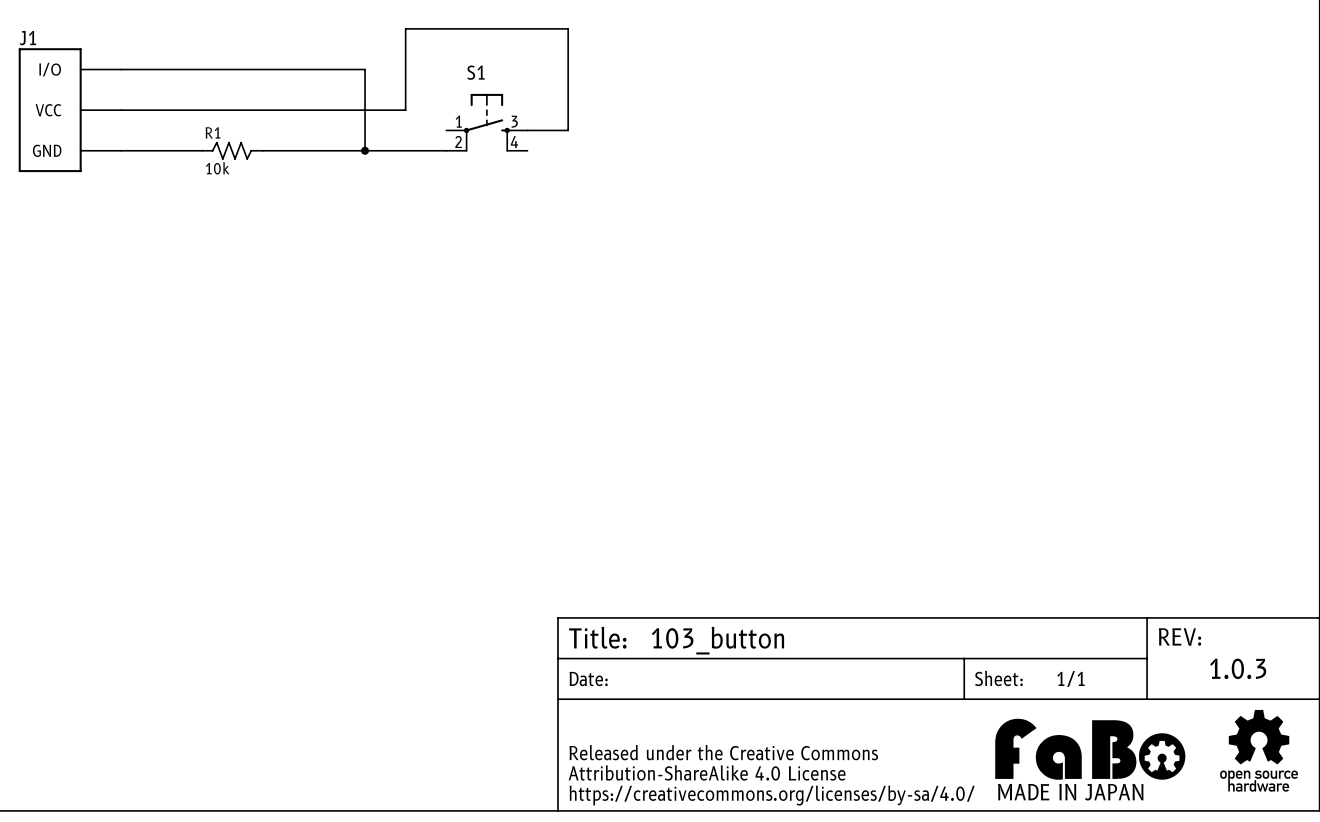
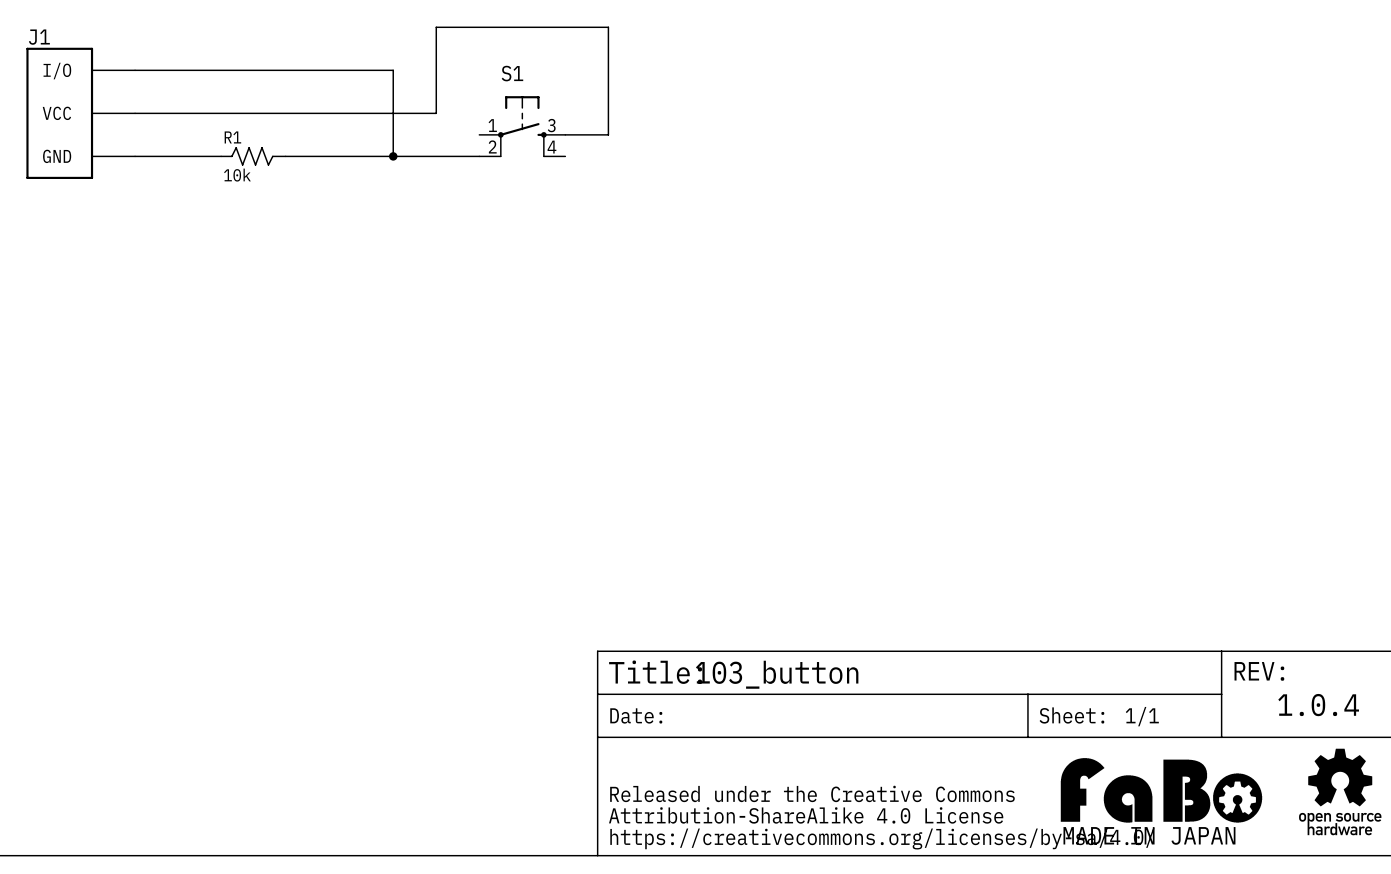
text: 1.0.3 (1238, 668) -> 1.0.4 (1318, 705)

